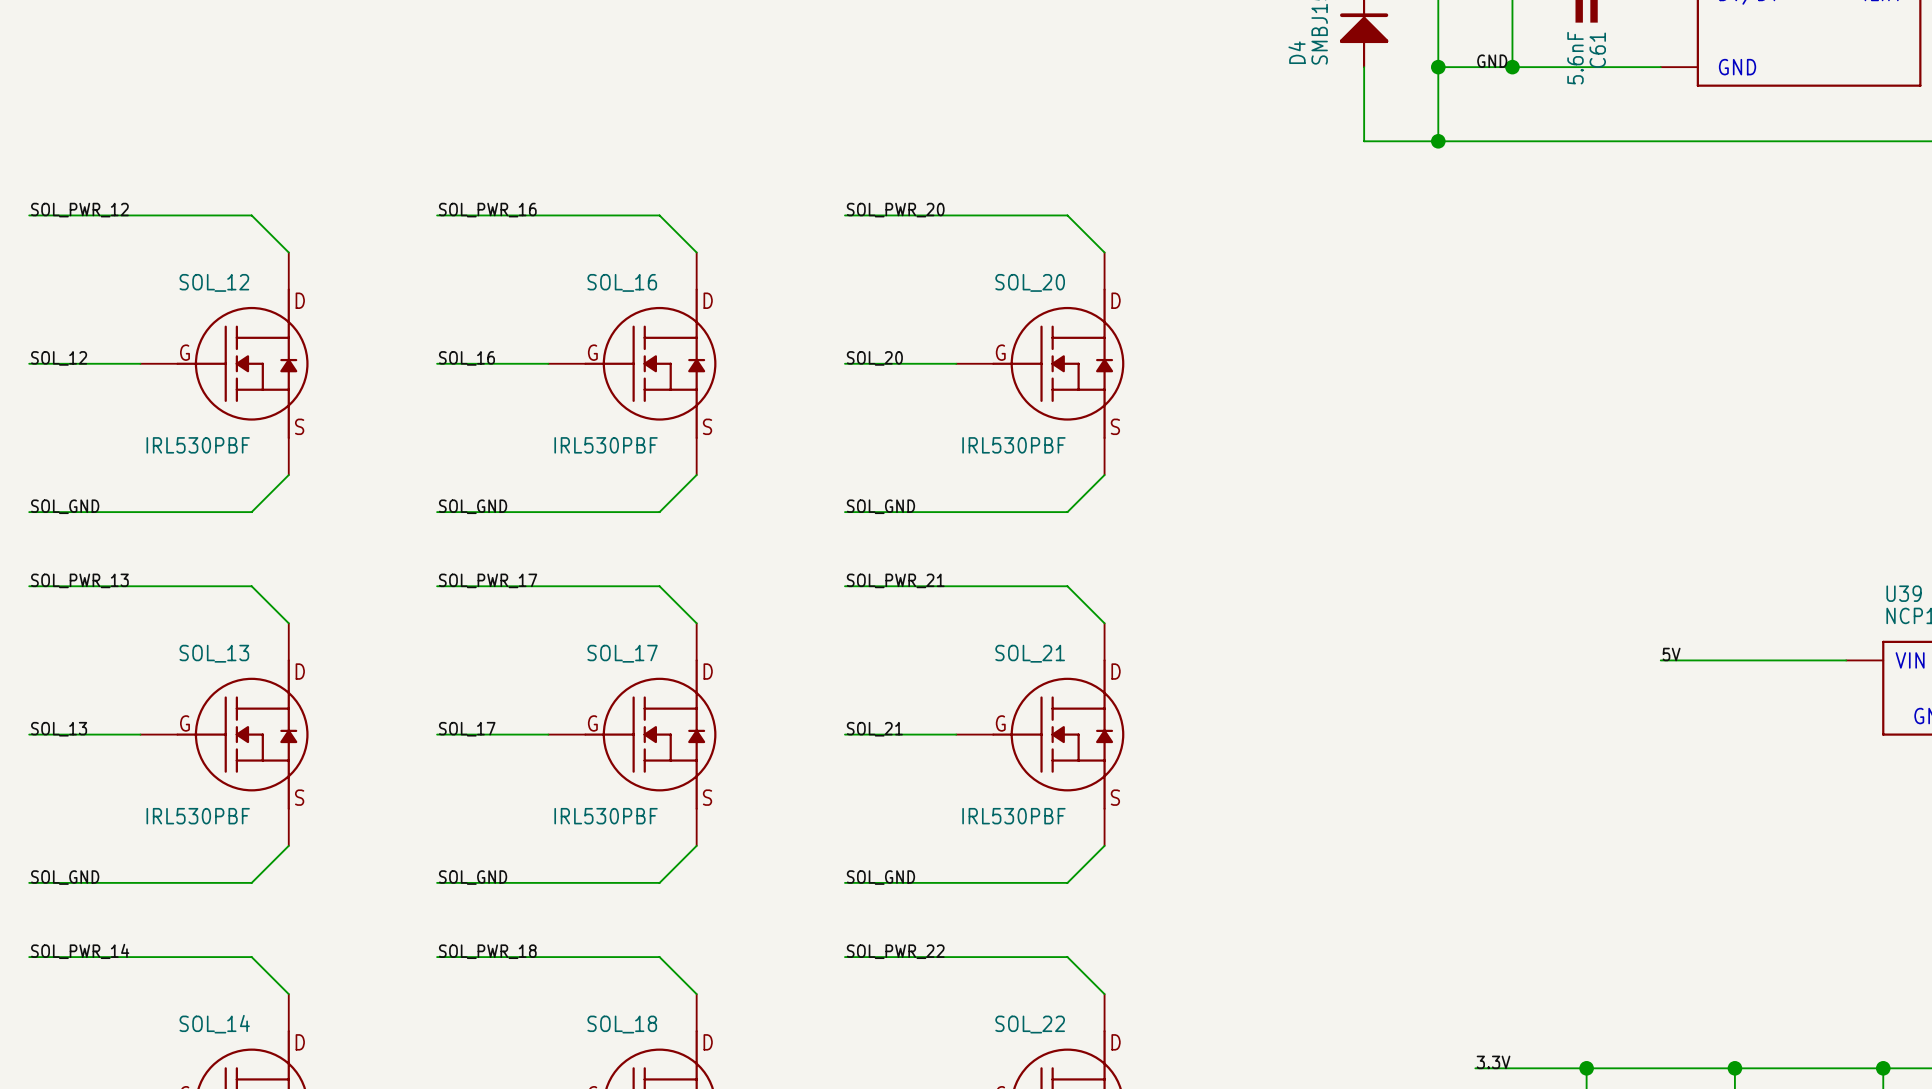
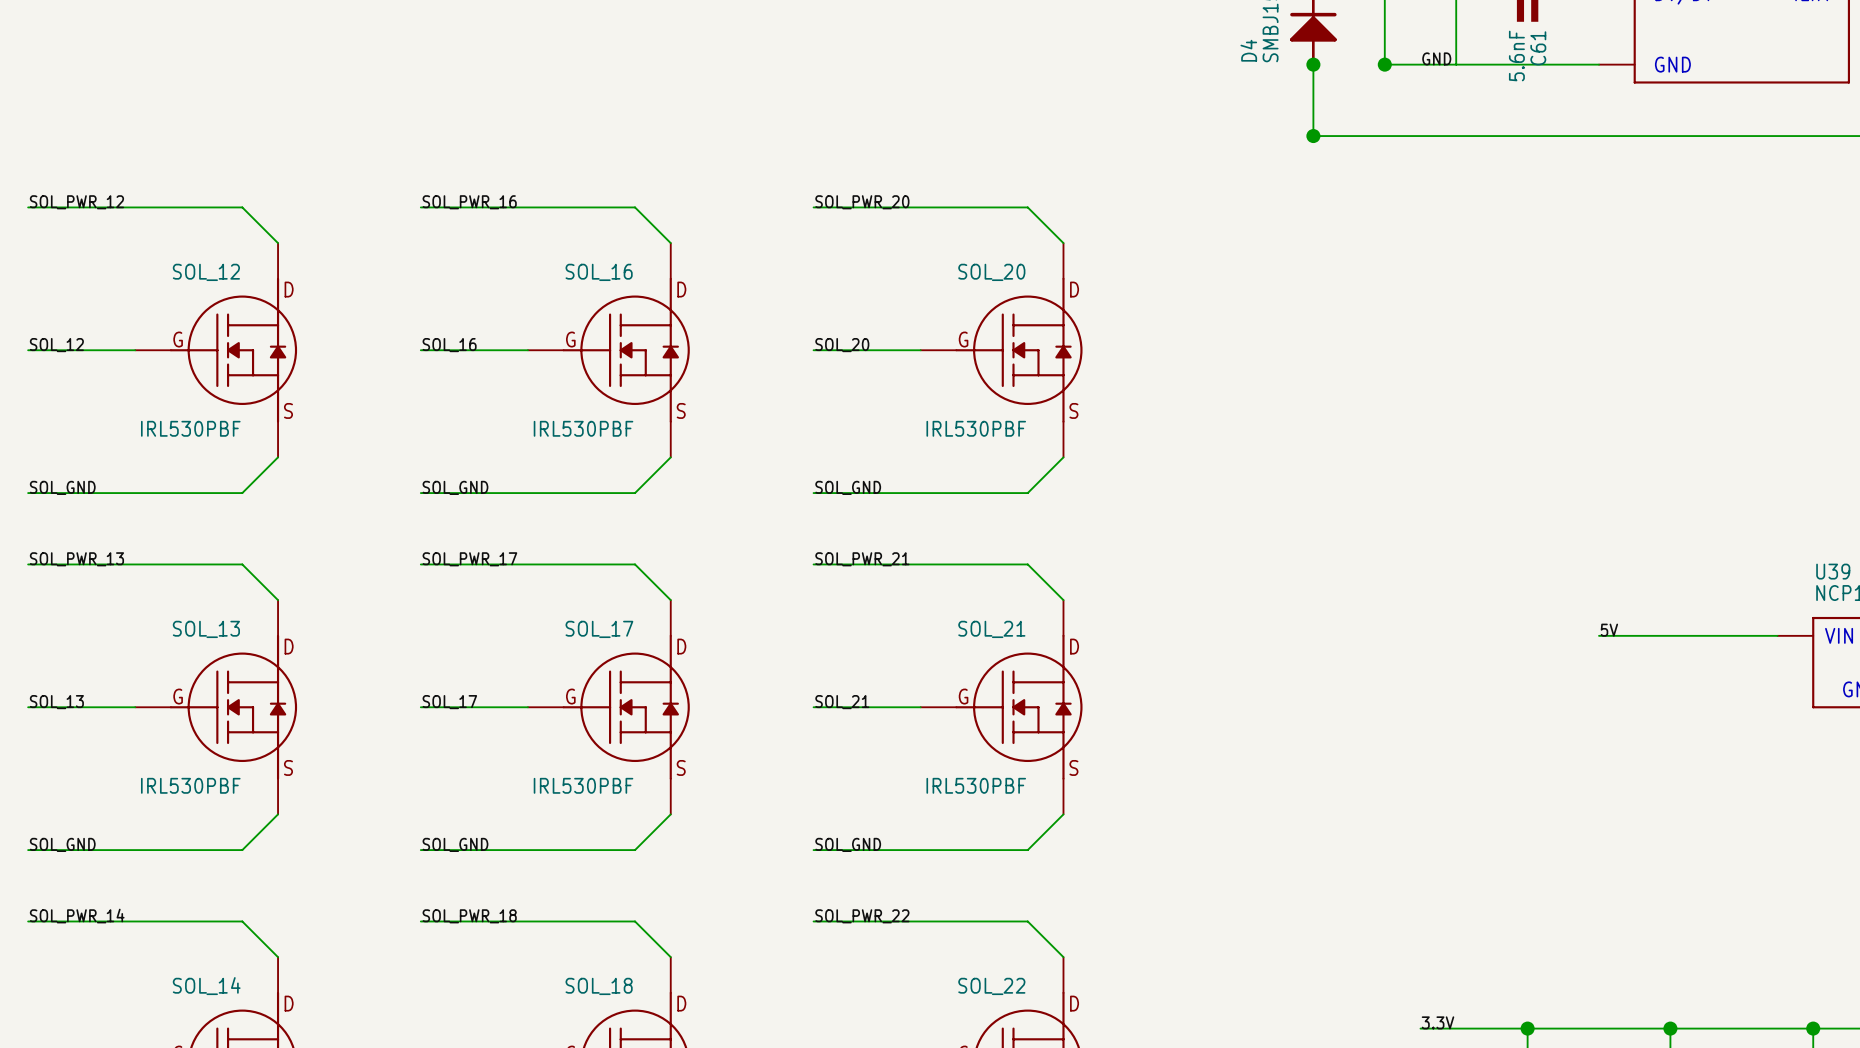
junction: none -> (1313, 64)
wire: (1438, 67) (1438, 141) -> none
junction: (1512, 67) -> none
junction: none -> (1313, 136)
junction: (1438, 141) -> none

